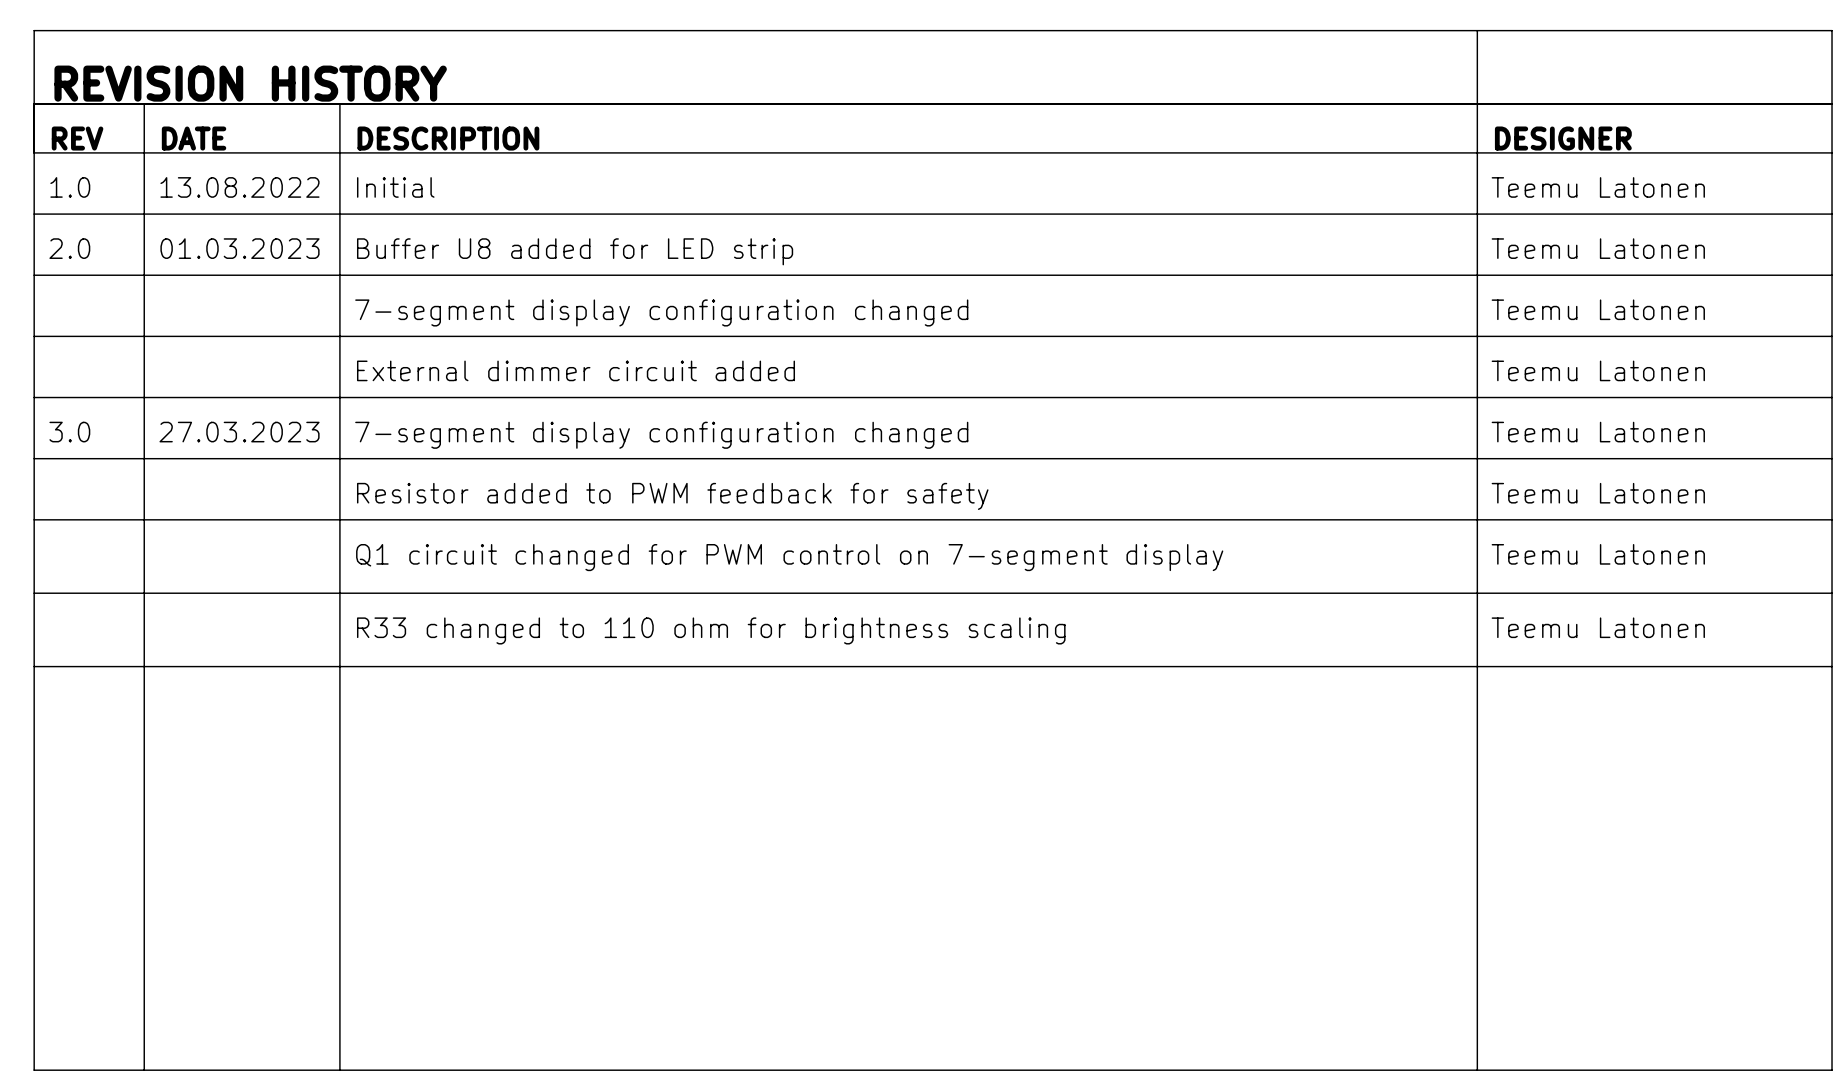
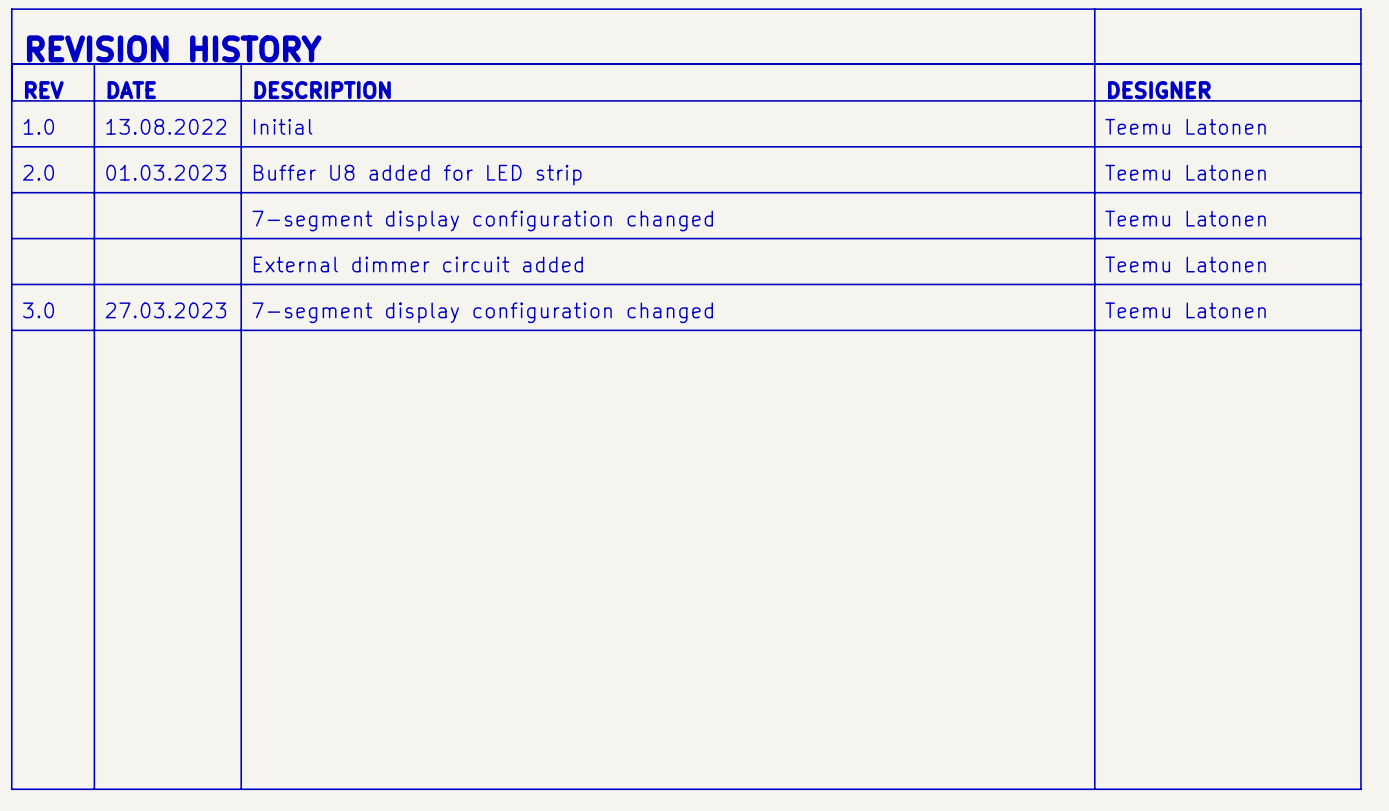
text: Teemu Latonen (1598, 493) -> none
text: Resistor added to PWM feedback for safety (672, 496) -> none
line: (34, 519) (1832, 519) -> none
text: Teemu Latonen (1598, 554) -> none
text: Q1 circuit changed for PWM control on 7-segment display (789, 557) -> none
line: (34, 593) (1832, 593) -> none
text: Teemu Latonen (1598, 627) -> none
text: R33 changed to 110 ohm for brightness scaling (711, 630) -> none
line: (34, 666) (1832, 666) -> none

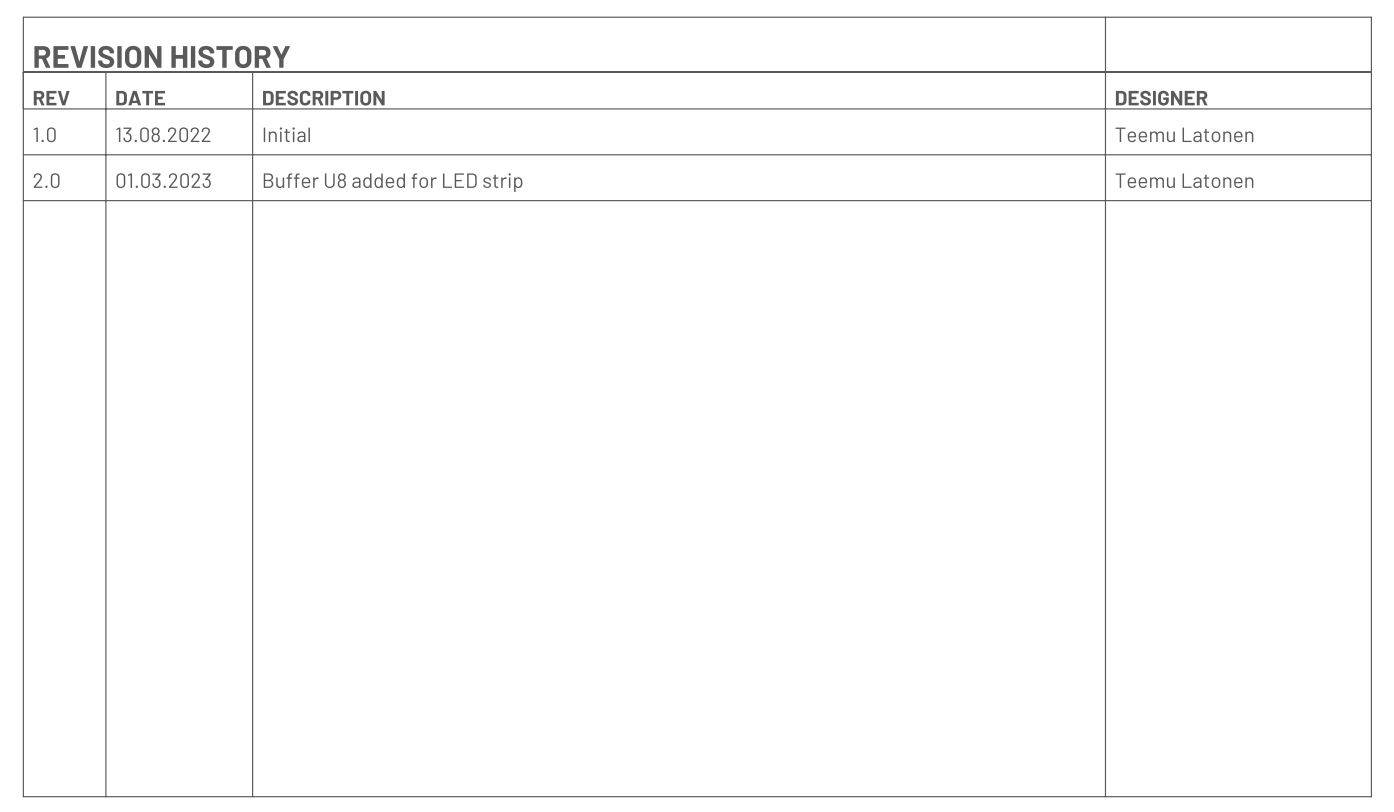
text: Teemu Latonen (1185, 218) -> none
text: 7-segment display configuration changed (482, 221) -> none
line: (11, 238) (1360, 238) -> none
text: External dimmer circuit added (418, 264) -> none
text: Teemu Latonen (1185, 264) -> none
line: (11, 284) (1360, 284) -> none
text: 3.0 (38, 310) -> none
text: 27.03.2023 (165, 310) -> none
text: Teemu Latonen (1185, 310) -> none
text: 7-segment display configuration changed (482, 312) -> none
line: (11, 330) (1360, 330) -> none

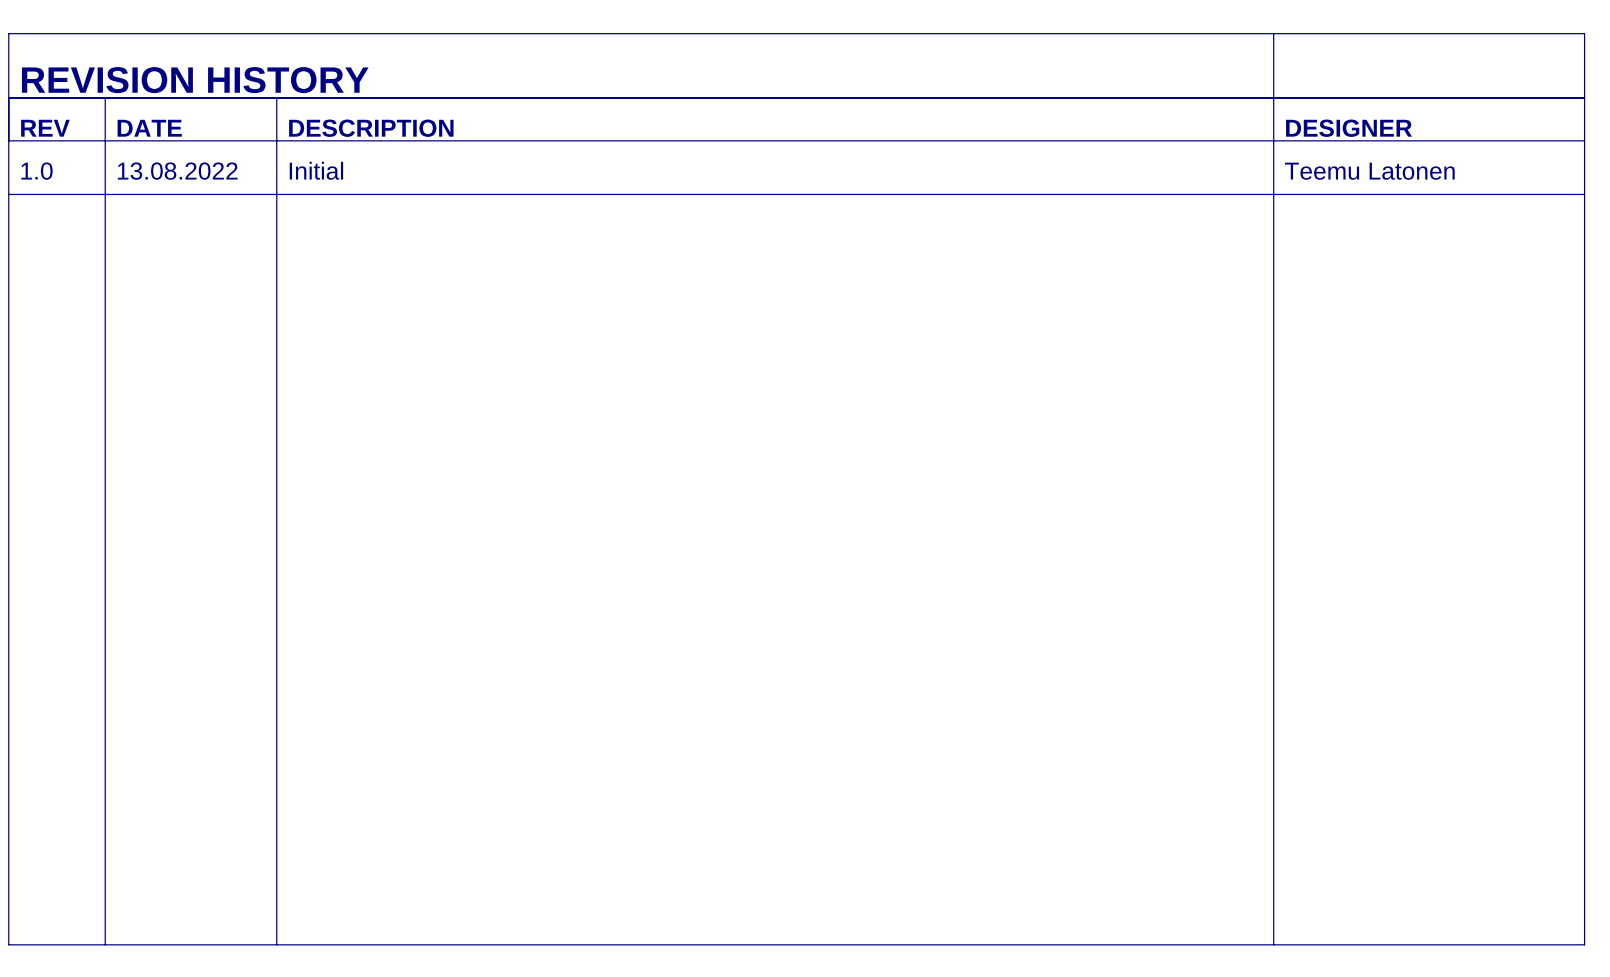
text: 2.0 (46, 180) -> none
text: 01.03.2023 (163, 180) -> none
text: Teemu Latonen (1184, 180) -> none
text: Buffer U8 added for LED strip (393, 182) -> none
line: (23, 200) (1371, 200) -> none

